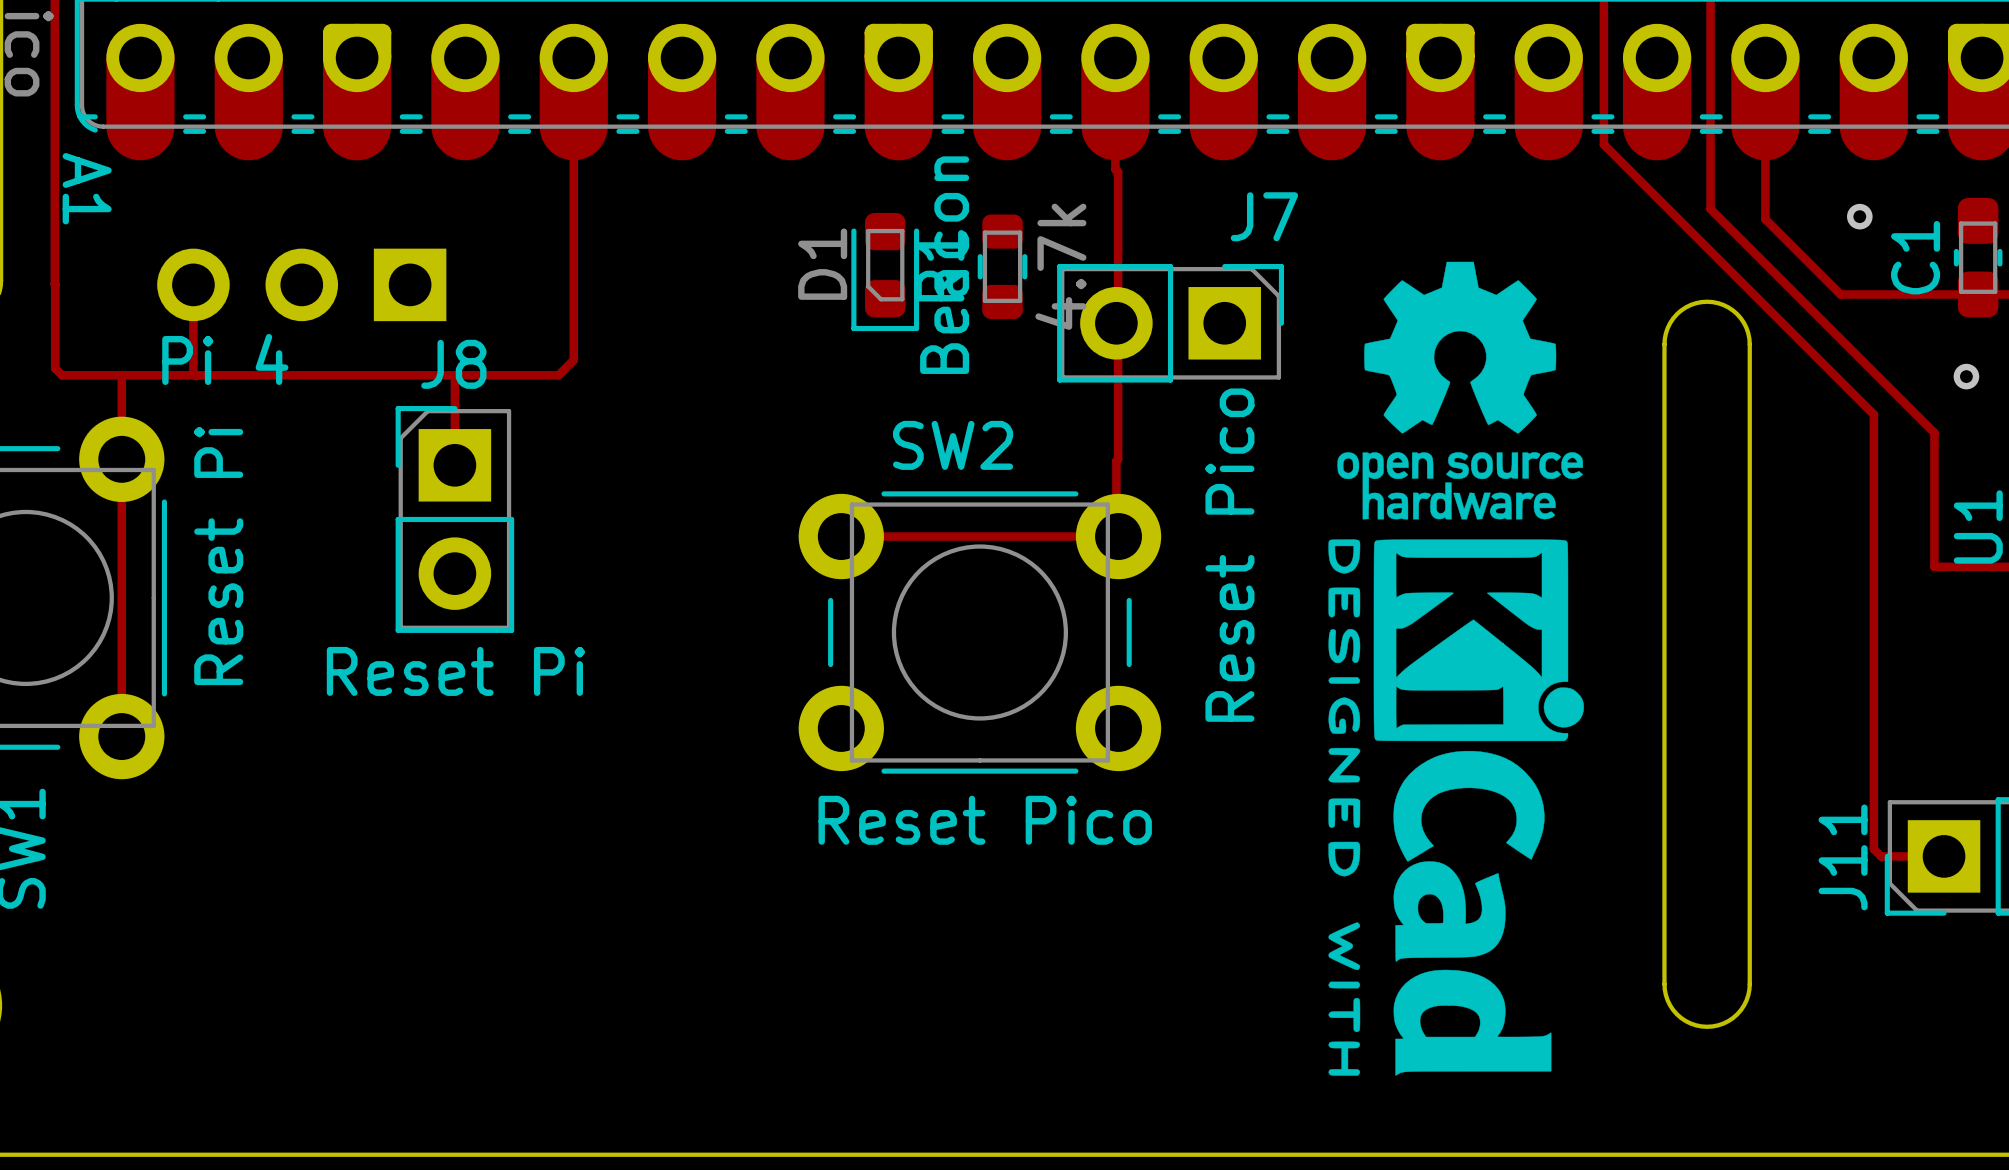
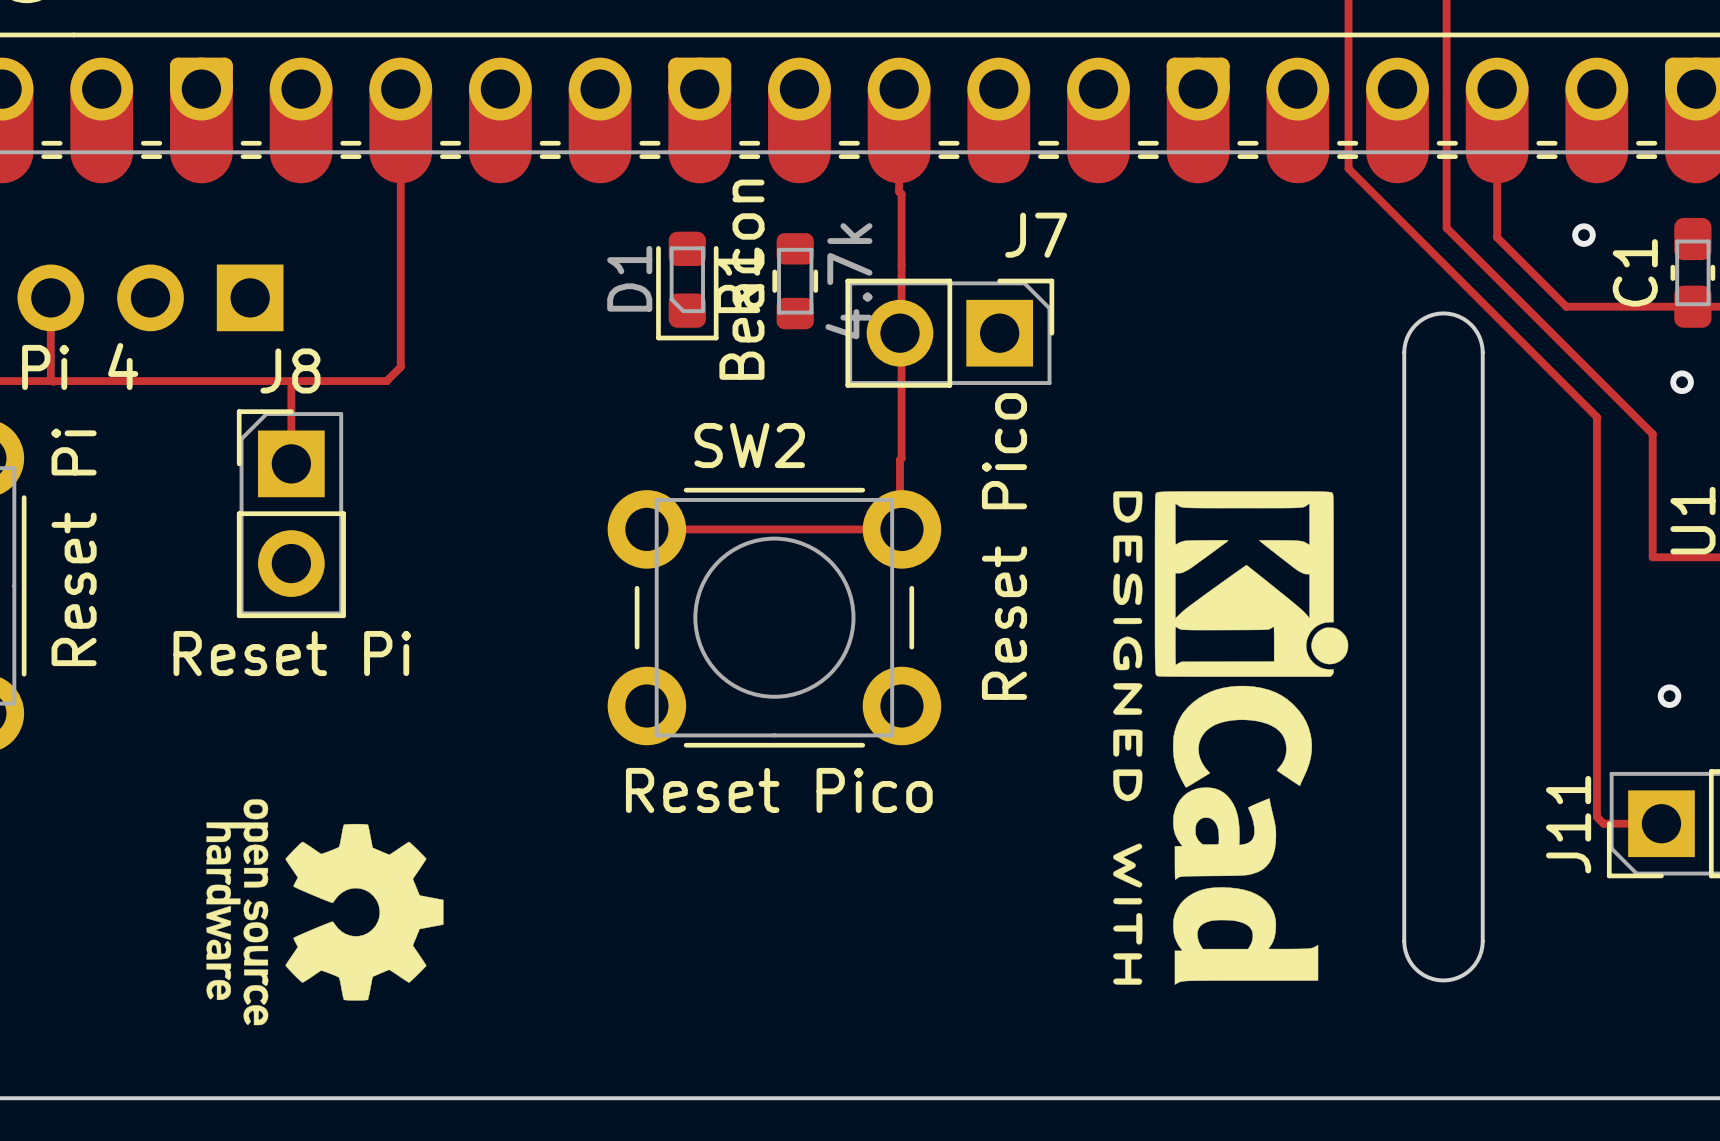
drawing: [1337, 261, 1584, 520] -> none
via: none -> (1669, 696)
drawing position: (1456, 807) -> (1230, 737)
drawing: none -> [206, 799, 444, 1026]

